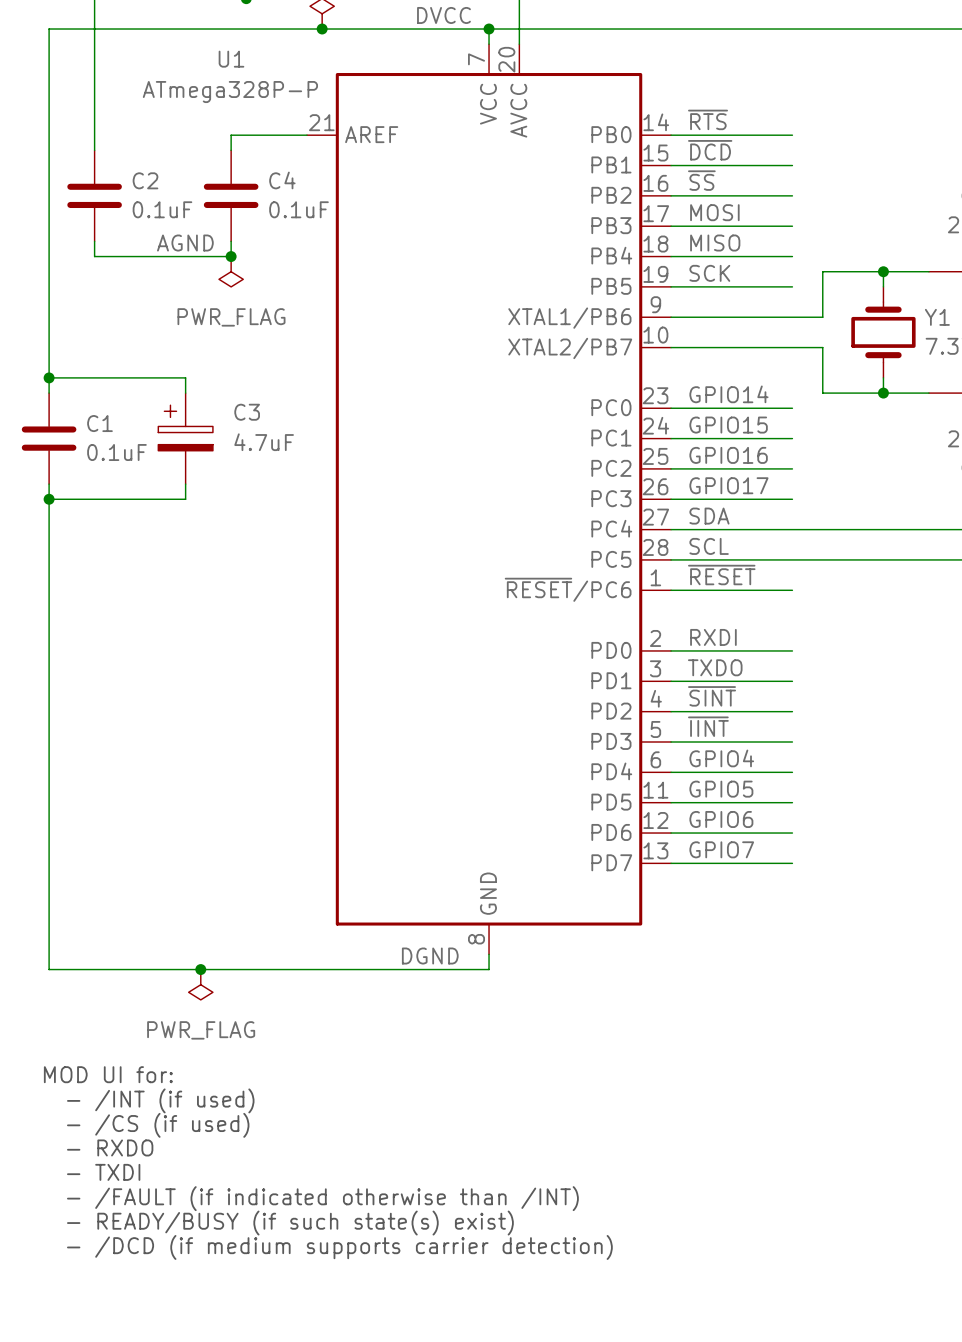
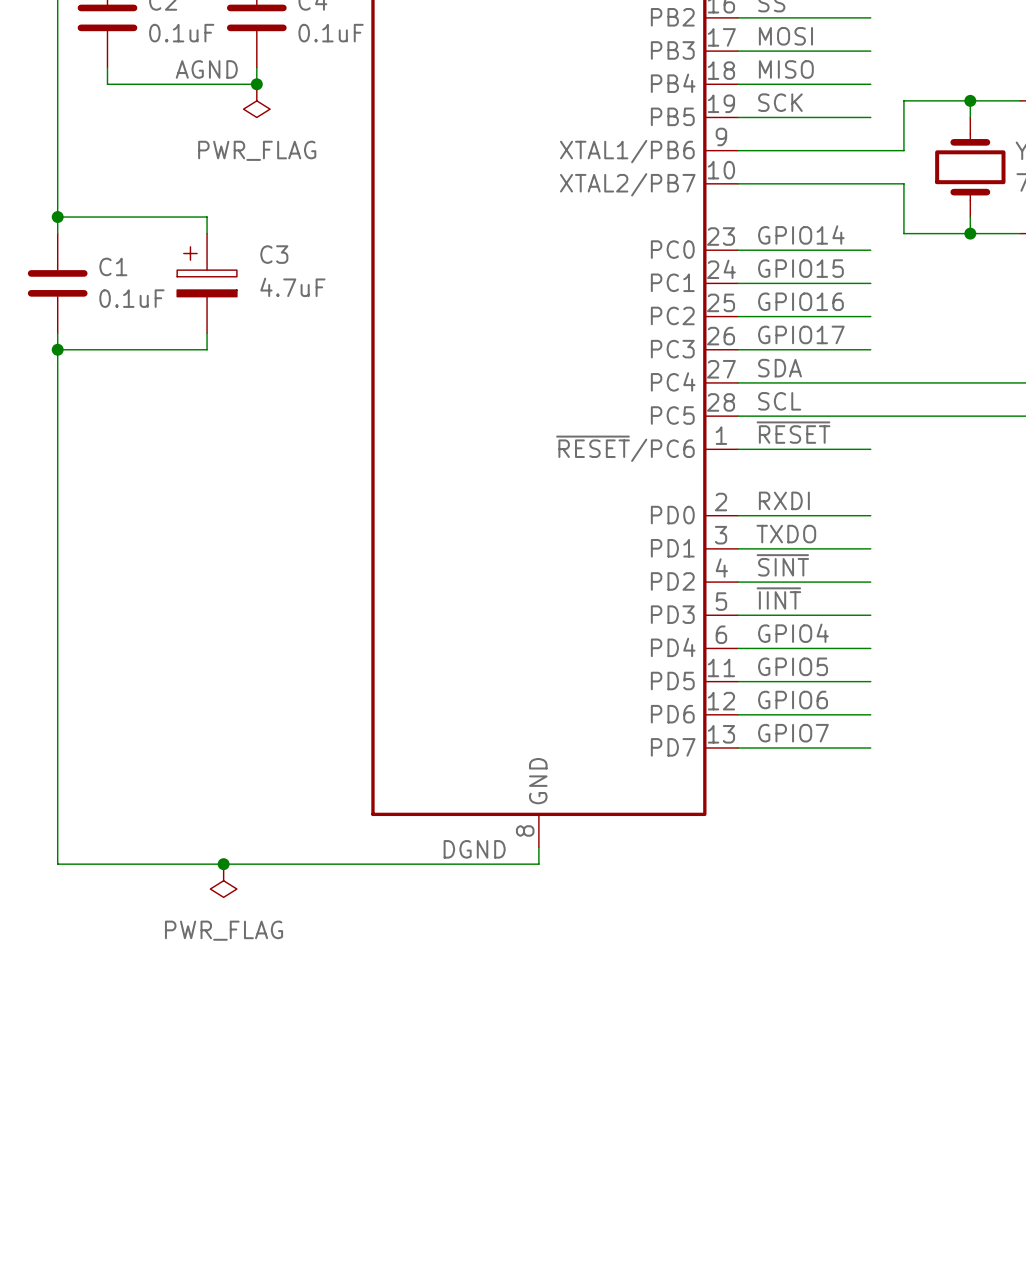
text: MOD UI for: (108, 1074) -> none
text: - /INT (if used) (160, 1100) -> none
text: - /CS (if used) (158, 1125) -> none
text: - RXDO (110, 1147) -> none
text: - TXDI (103, 1172) -> none
text: - /FAULT (if indicated otherwise than /INT) (322, 1198) -> none
text: - READY/BUSY (if such state(s) exist) (290, 1223) -> none
text: - /DCD (if medium supports carrier detection) (339, 1247) -> none

